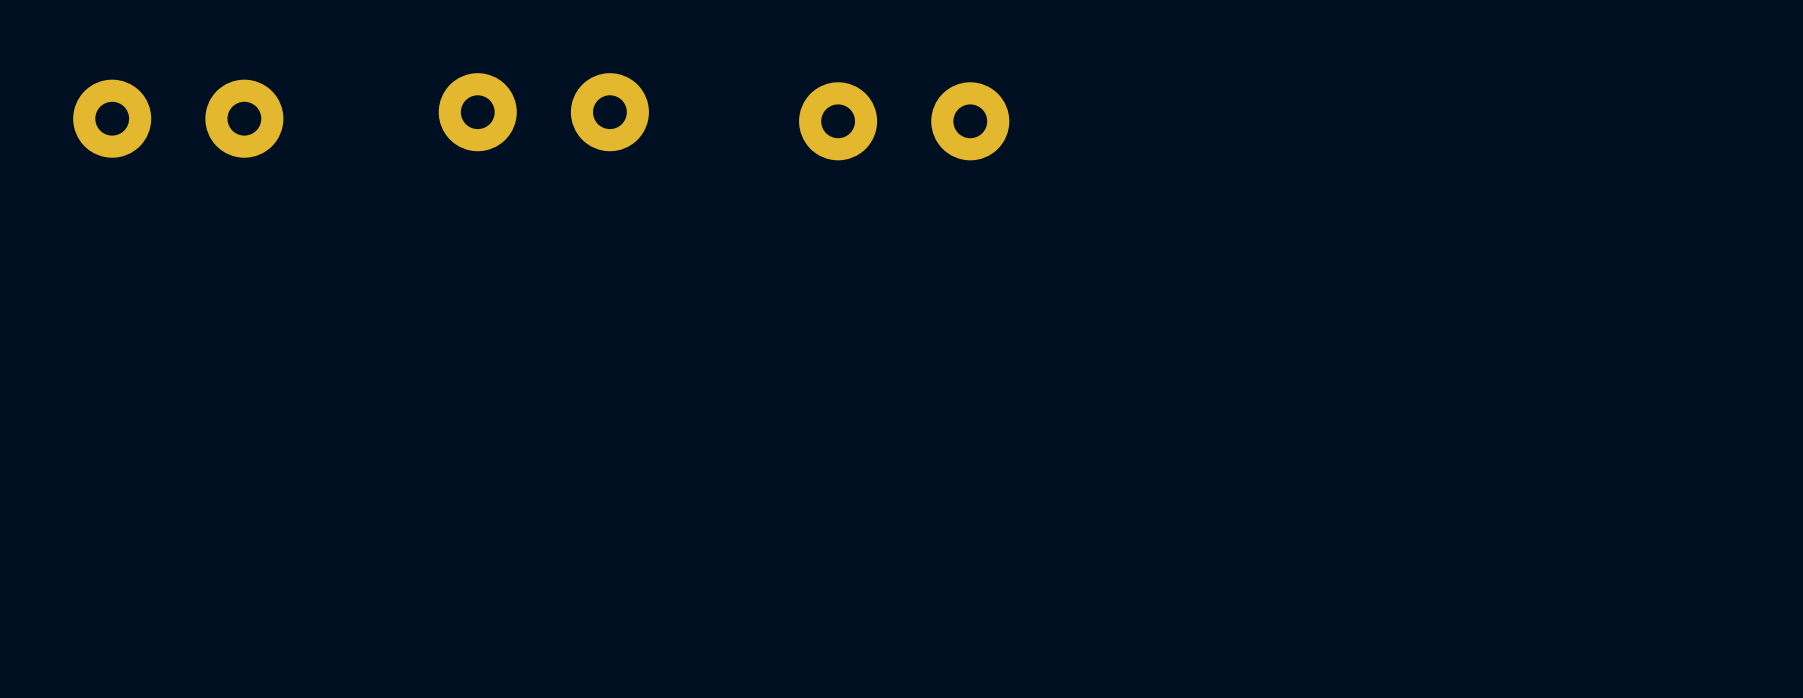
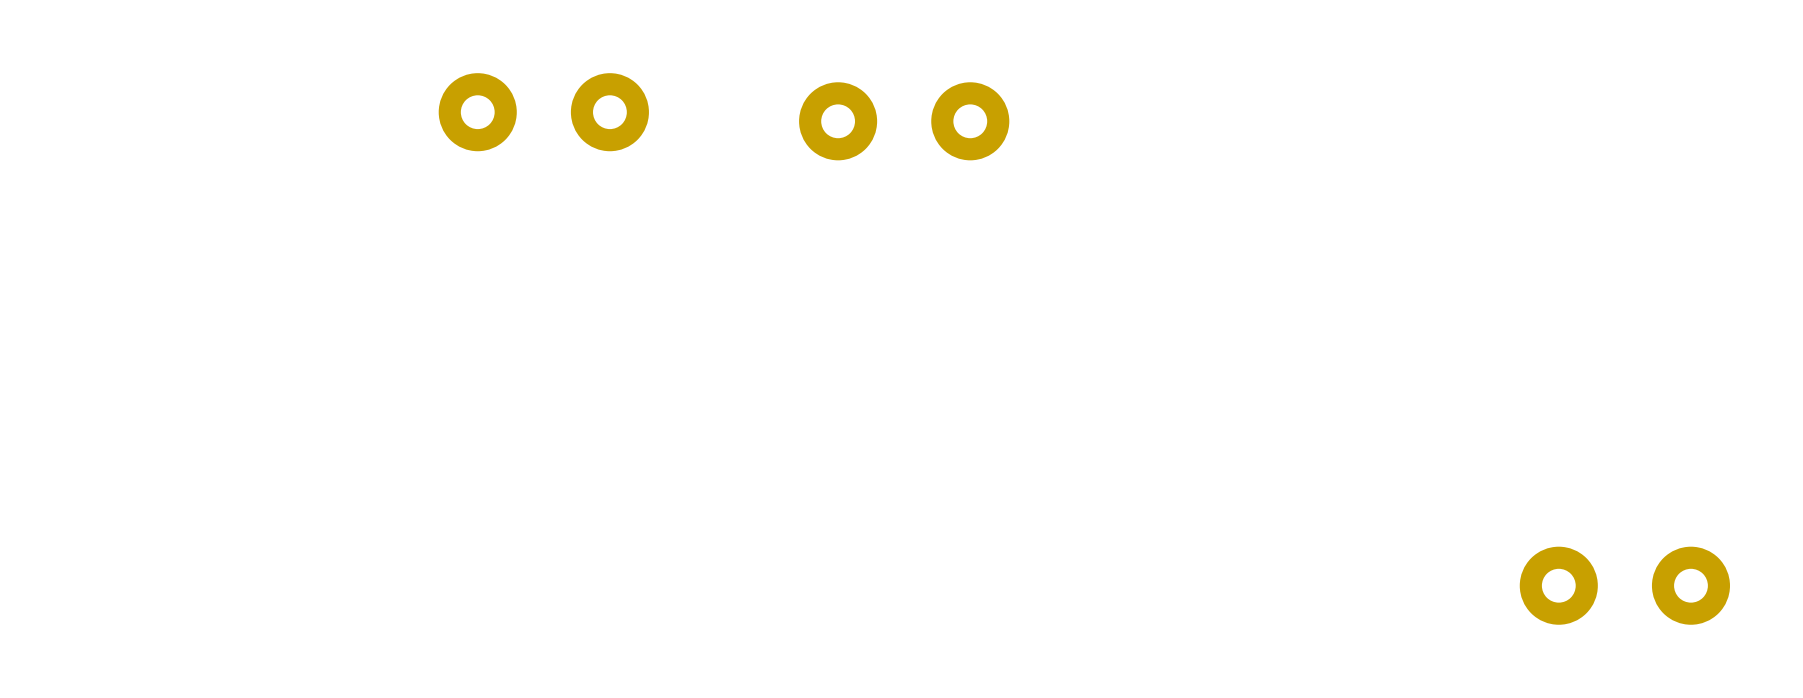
part: (178, 118) -> none
part: none -> (1624, 585)

